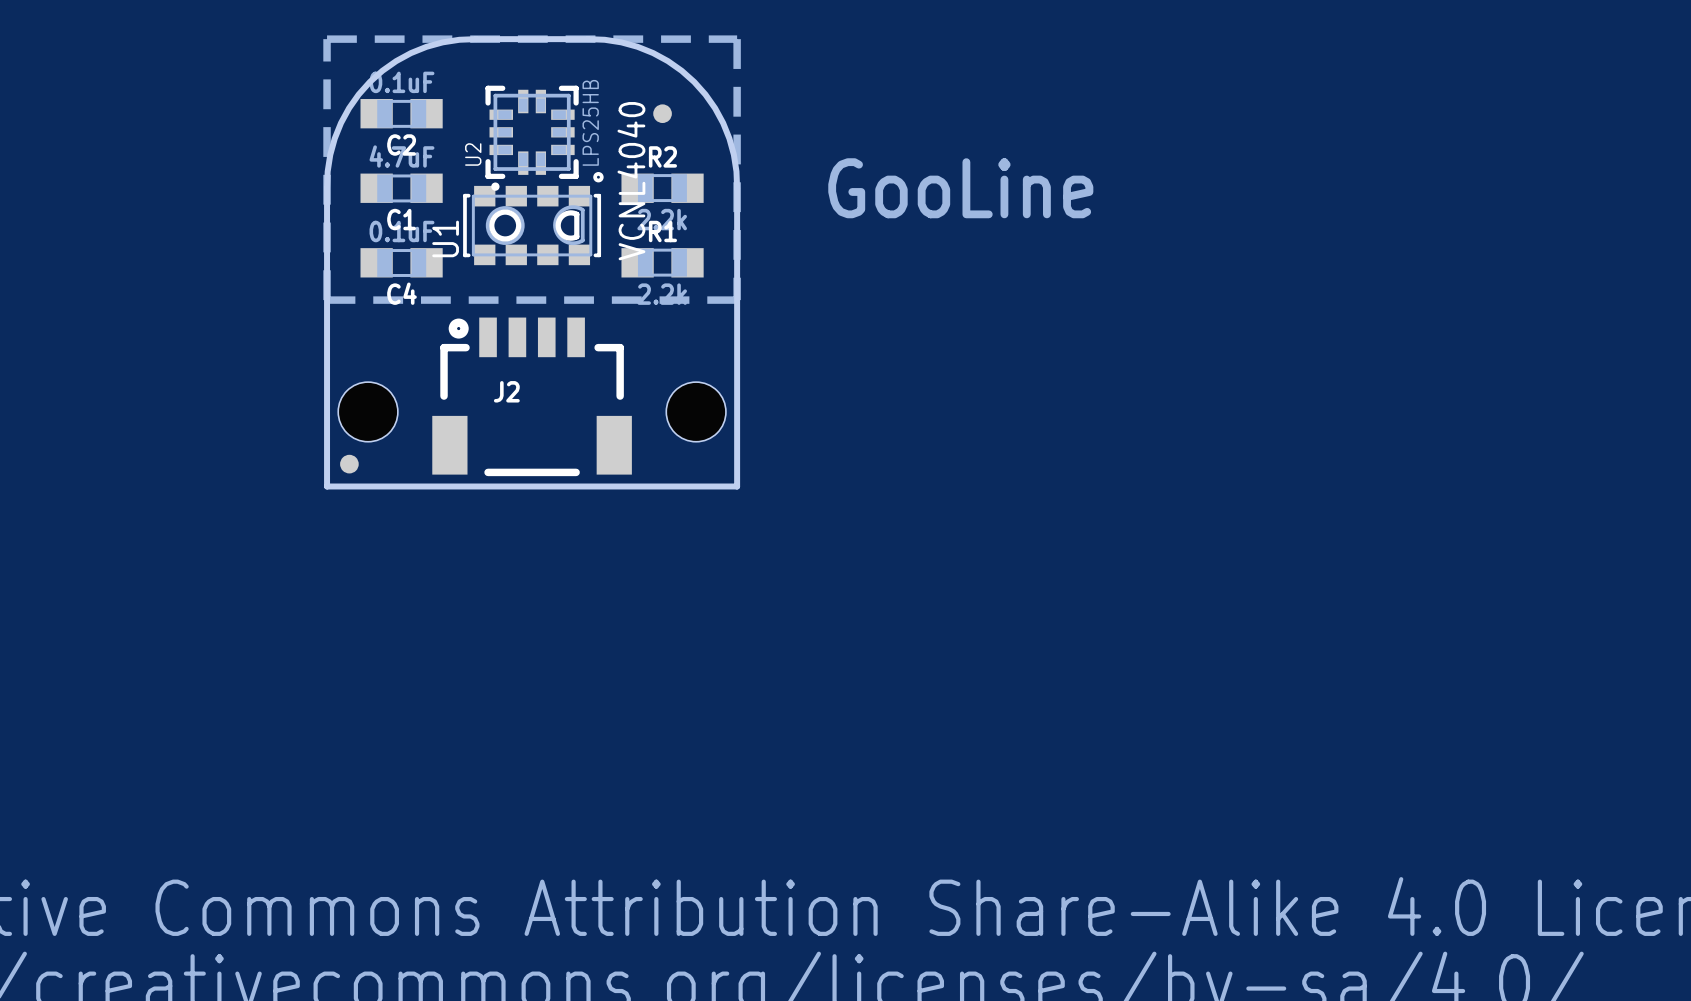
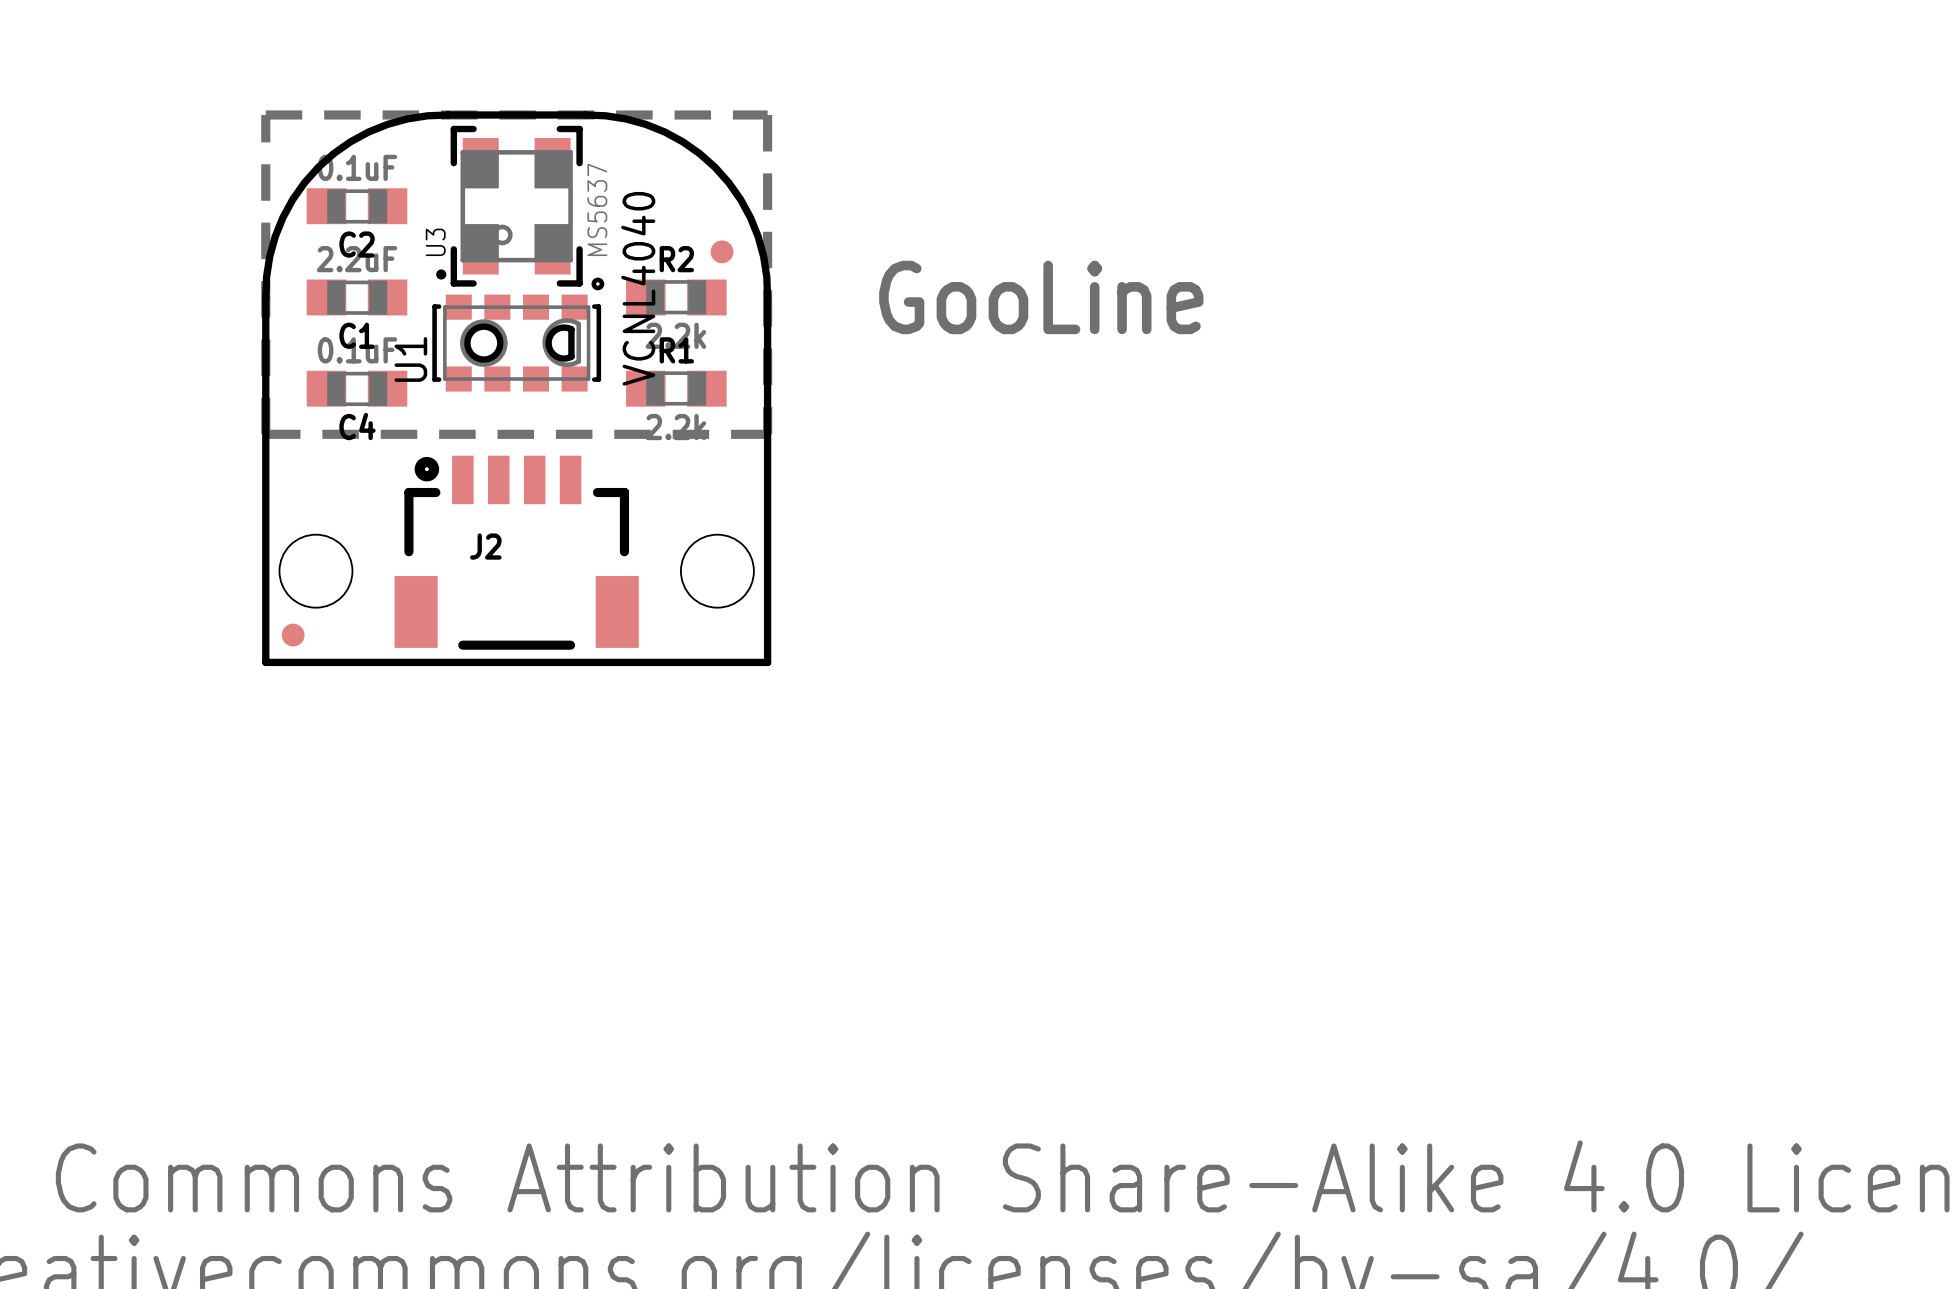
U3: none -> MS5637 (509, 206)
part position: (662, 113) -> (721, 251)
U2: LPS25HB (532, 138) -> none
C1 value: 4.7uF (401, 156) -> 2.2uF (357, 259)

